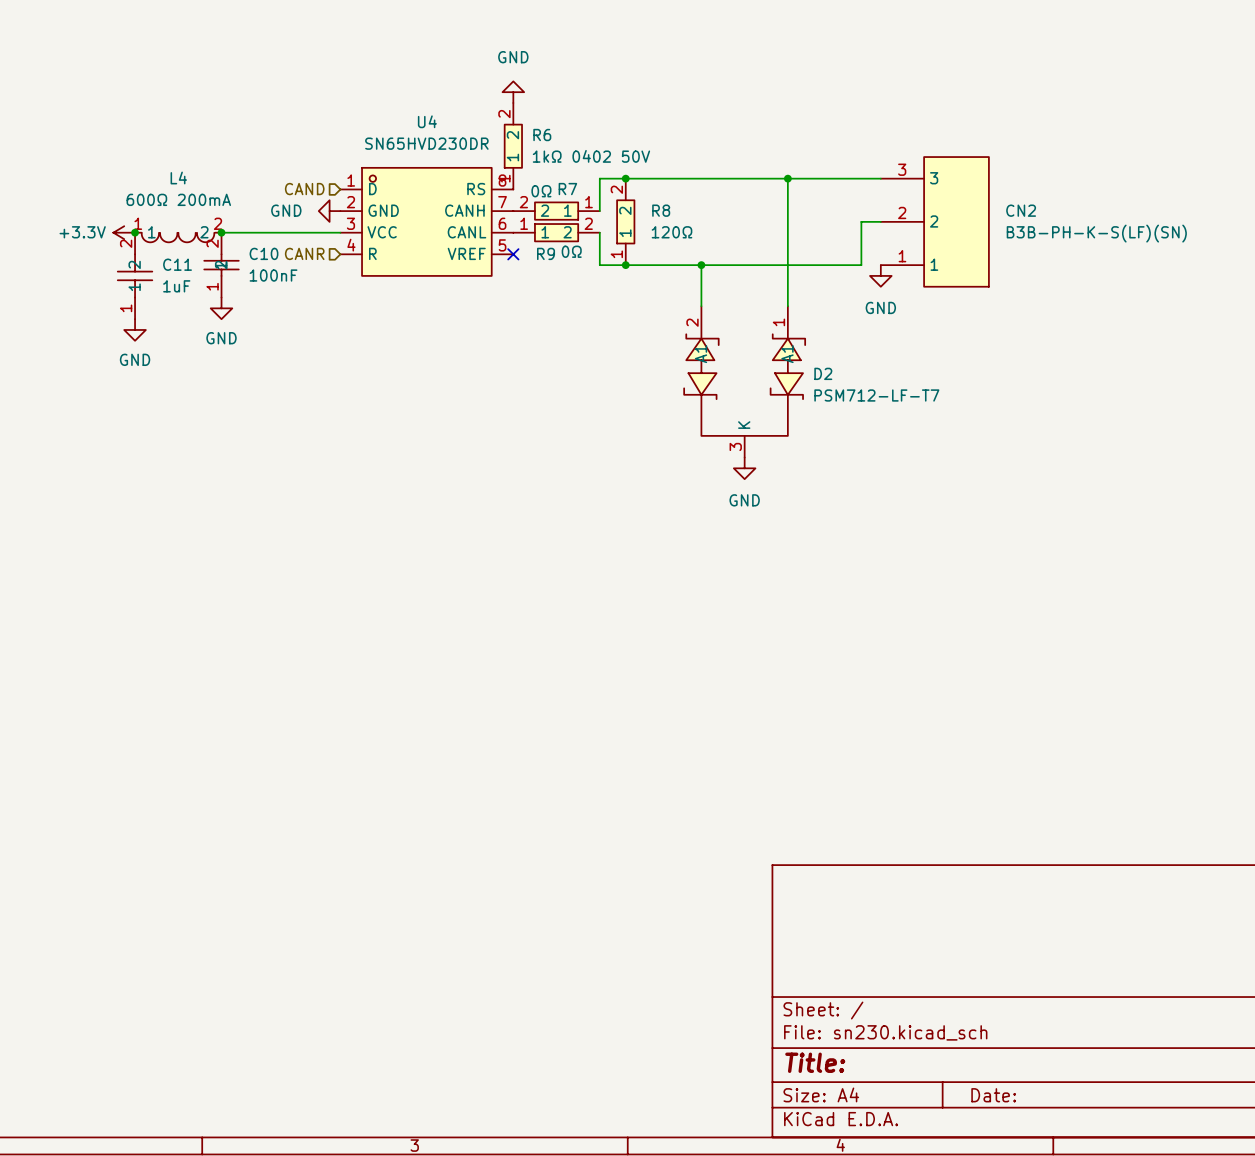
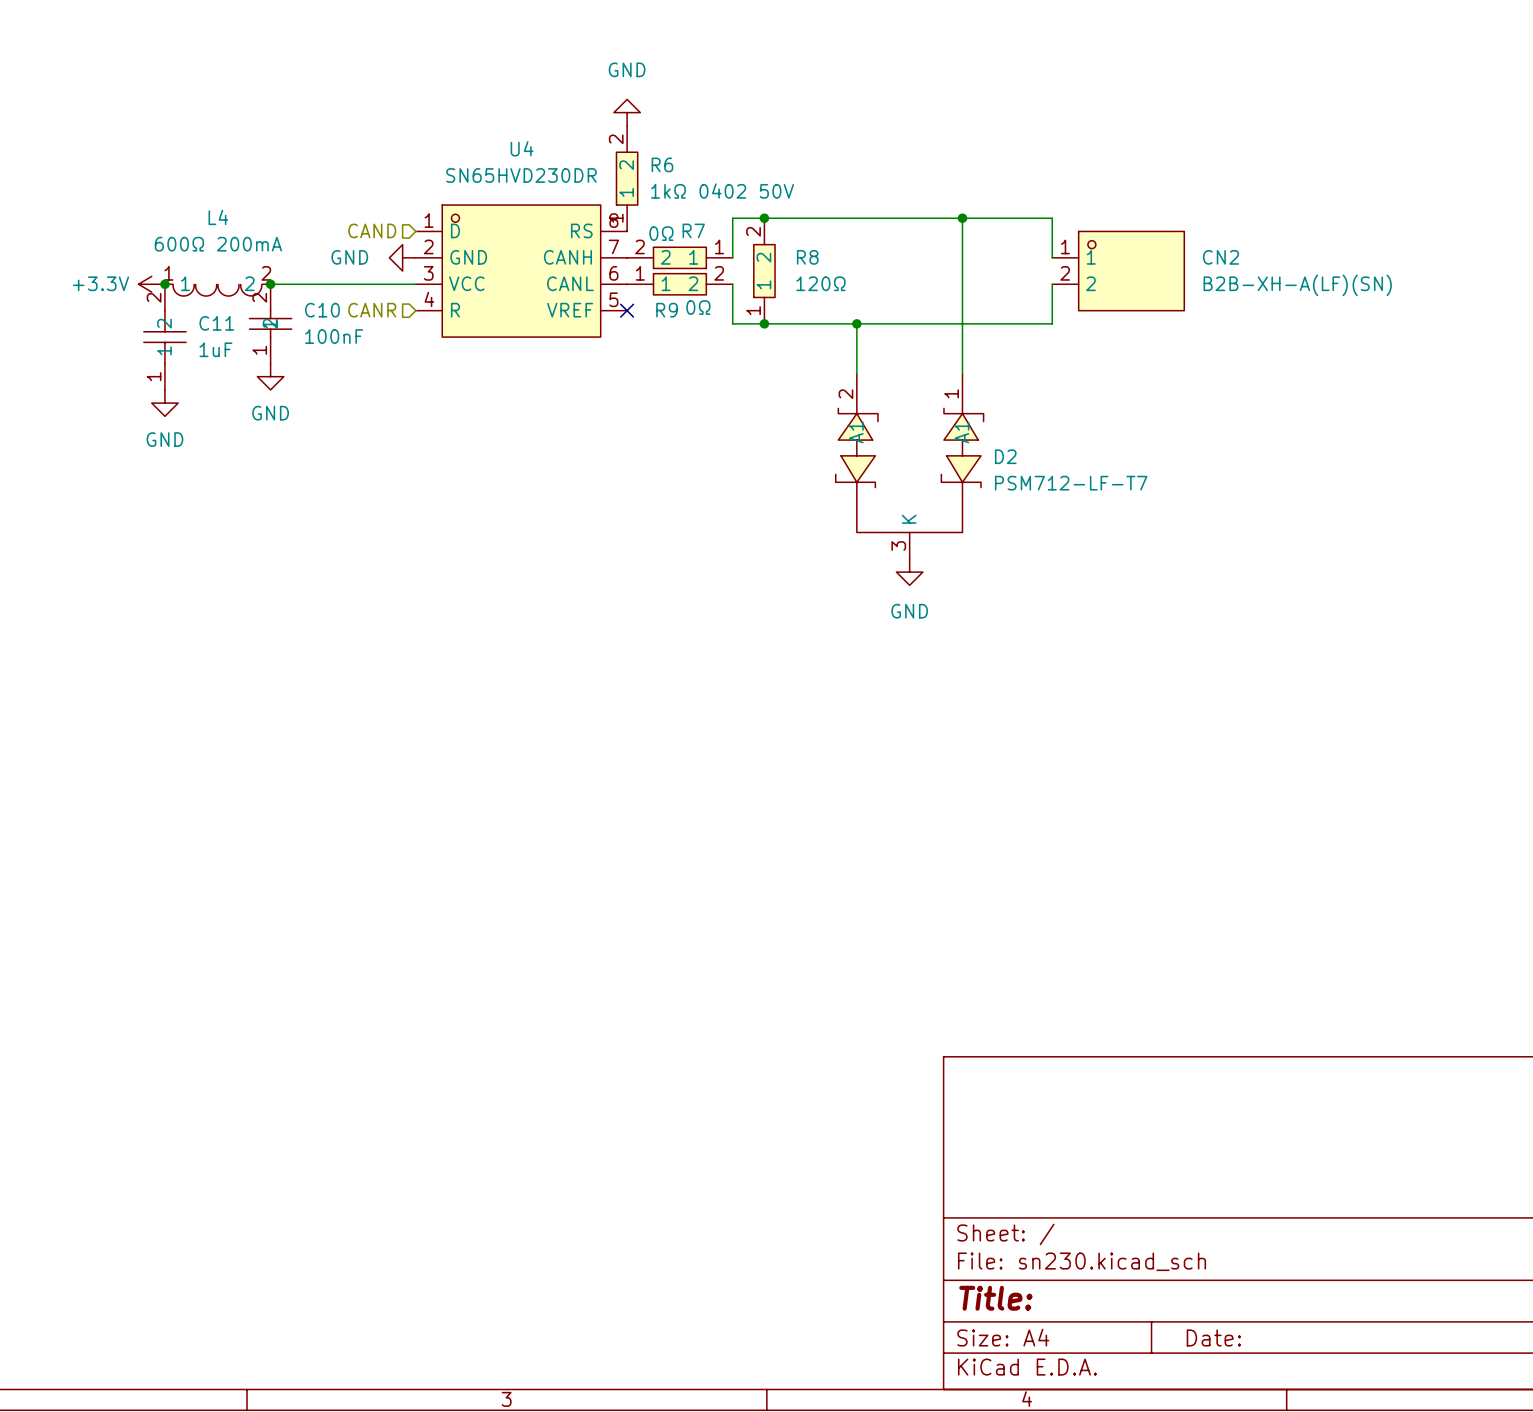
CN2 symbol: [880, 157, 989, 287] -> [1052, 231, 1185, 311]
wire: (861, 178) (880, 178) -> (1052, 218) (1052, 257)
wire: (880, 221) (861, 221) (861, 232) -> none
CN2 value: B3B-PH-K-S(LF)(SN) (1096, 233) -> B2B-XH-A(LF)(SN) (1297, 285)
power symbol: GND (880, 275) -> none

